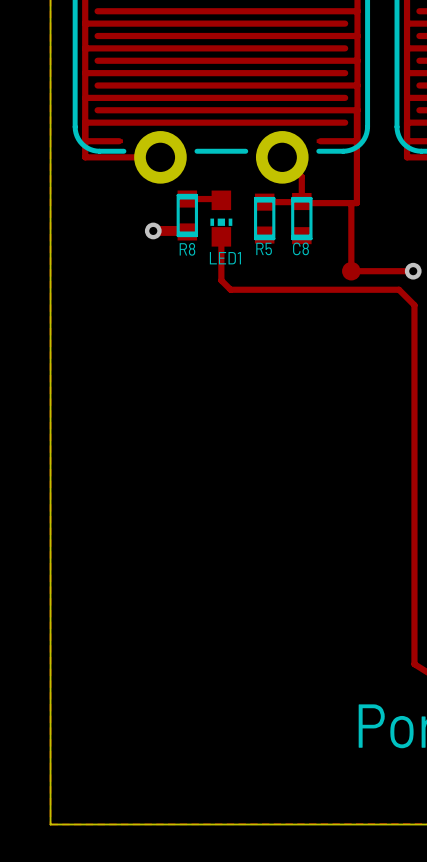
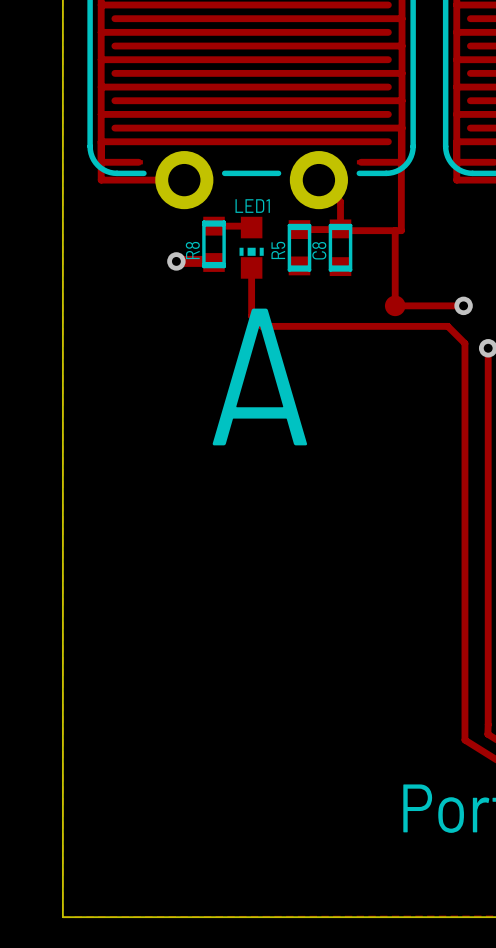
R5 name rotation: 0° (264, 248) -> 90° counterclockwise (278, 250)
R5 name position: R5 (264, 248) -> R5 (278, 250)
C8 name rotation: 0° (300, 248) -> 90° counterclockwise (319, 250)
C8 name position: C8 (300, 248) -> C8 (319, 250)
R8 name rotation: 0° (187, 249) -> 90° counterclockwise (192, 250)
R8 name position: R8 (187, 249) -> R8 (192, 250)
LED1 name position: LED1 (225, 258) -> LED1 (252, 206)
text: none -> A (259, 376)

